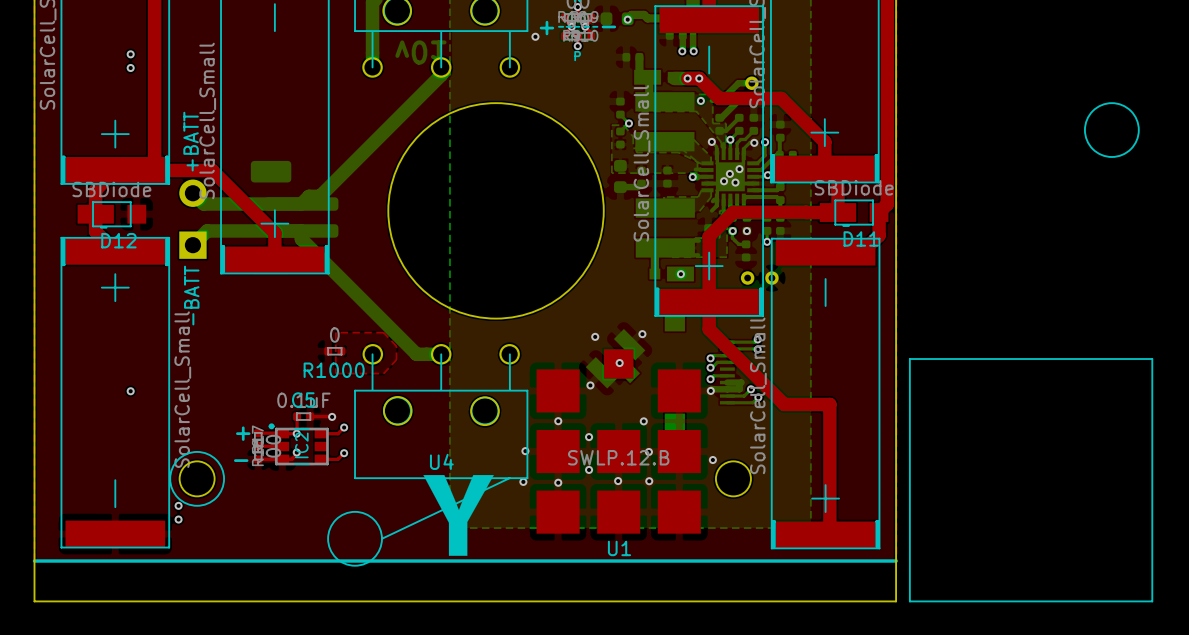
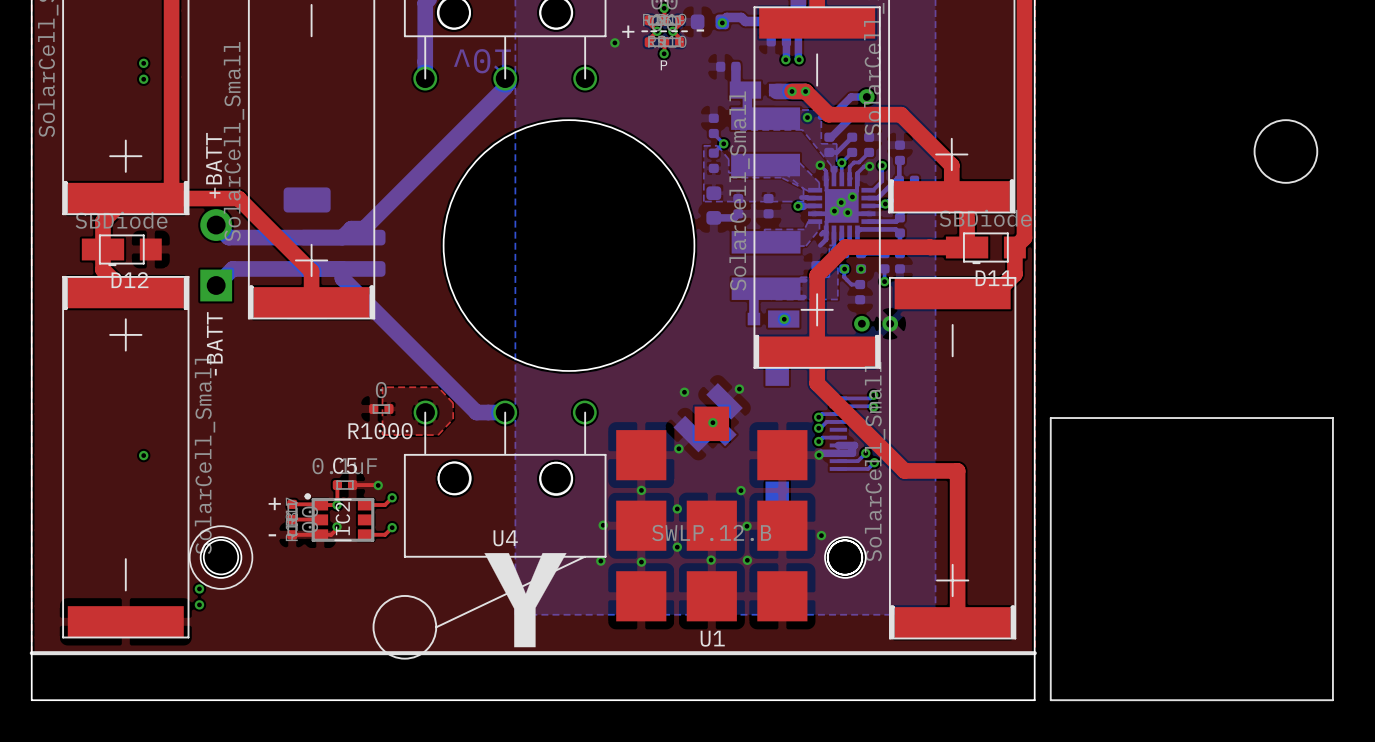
round board edge: none -> [203, 539, 239, 575]
round board edge: none -> [826, 539, 864, 576]

